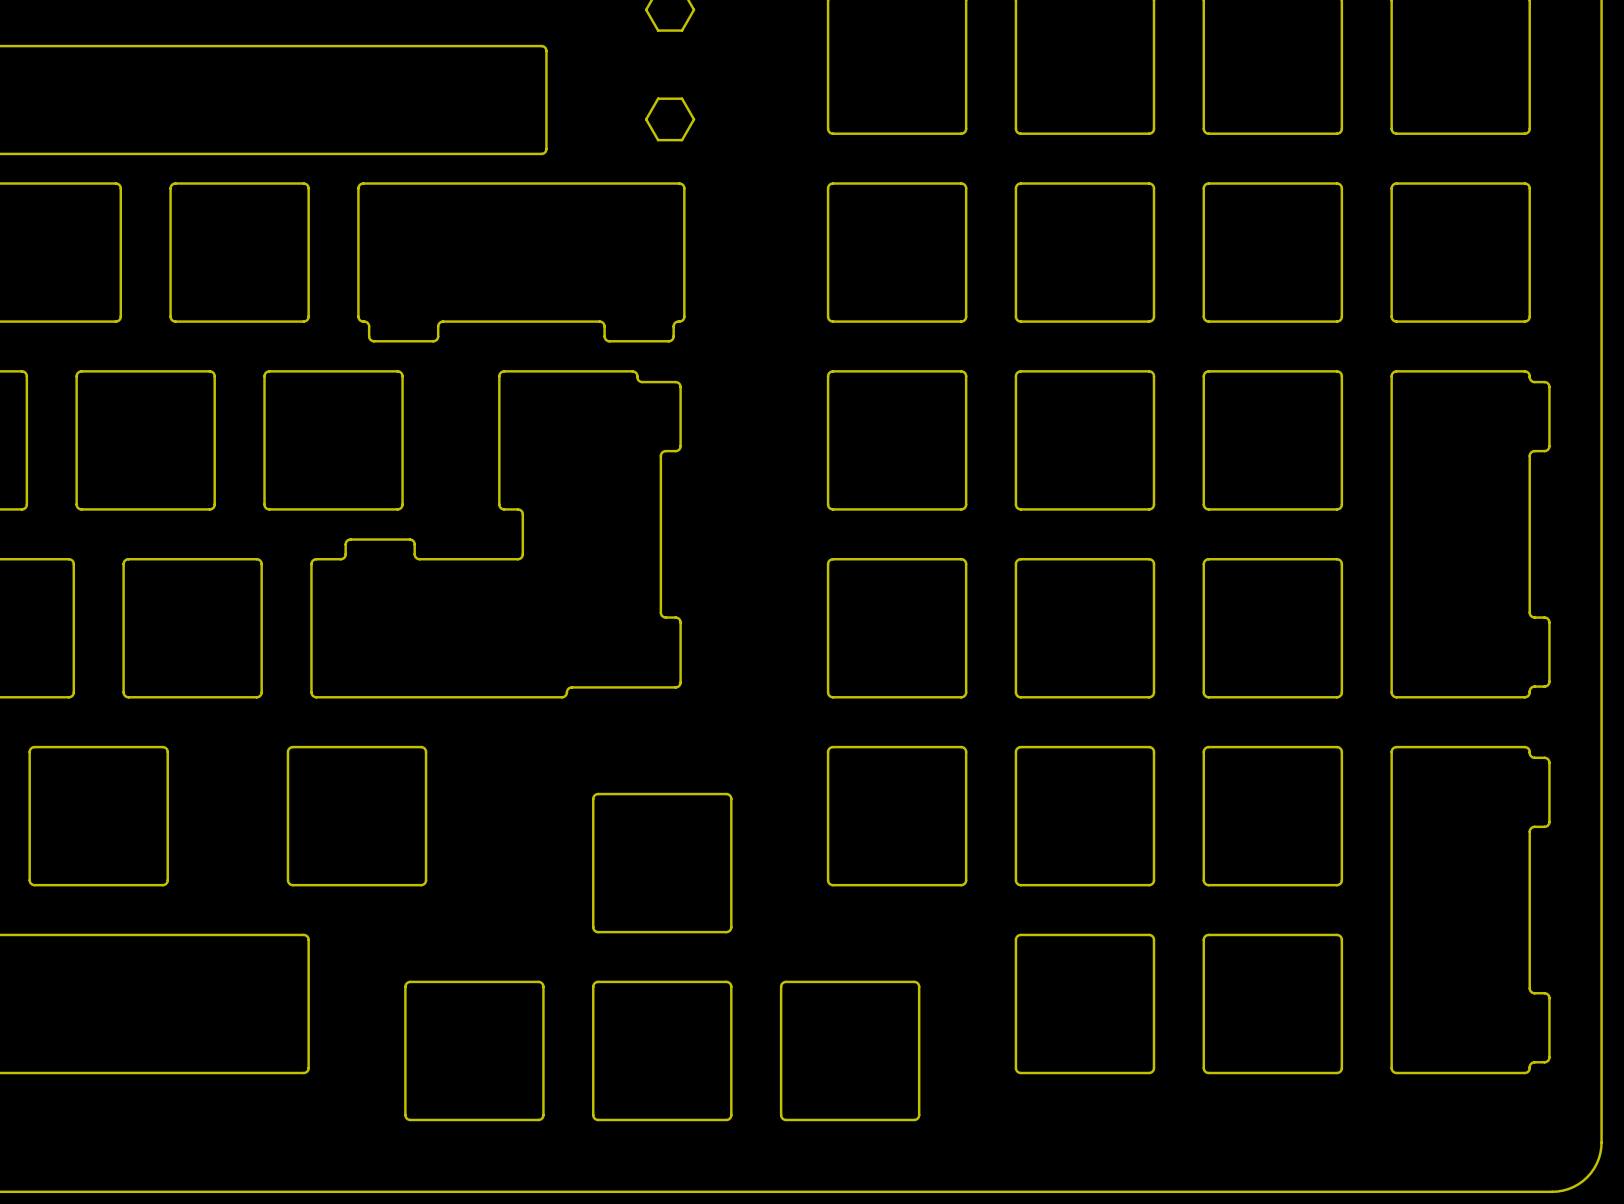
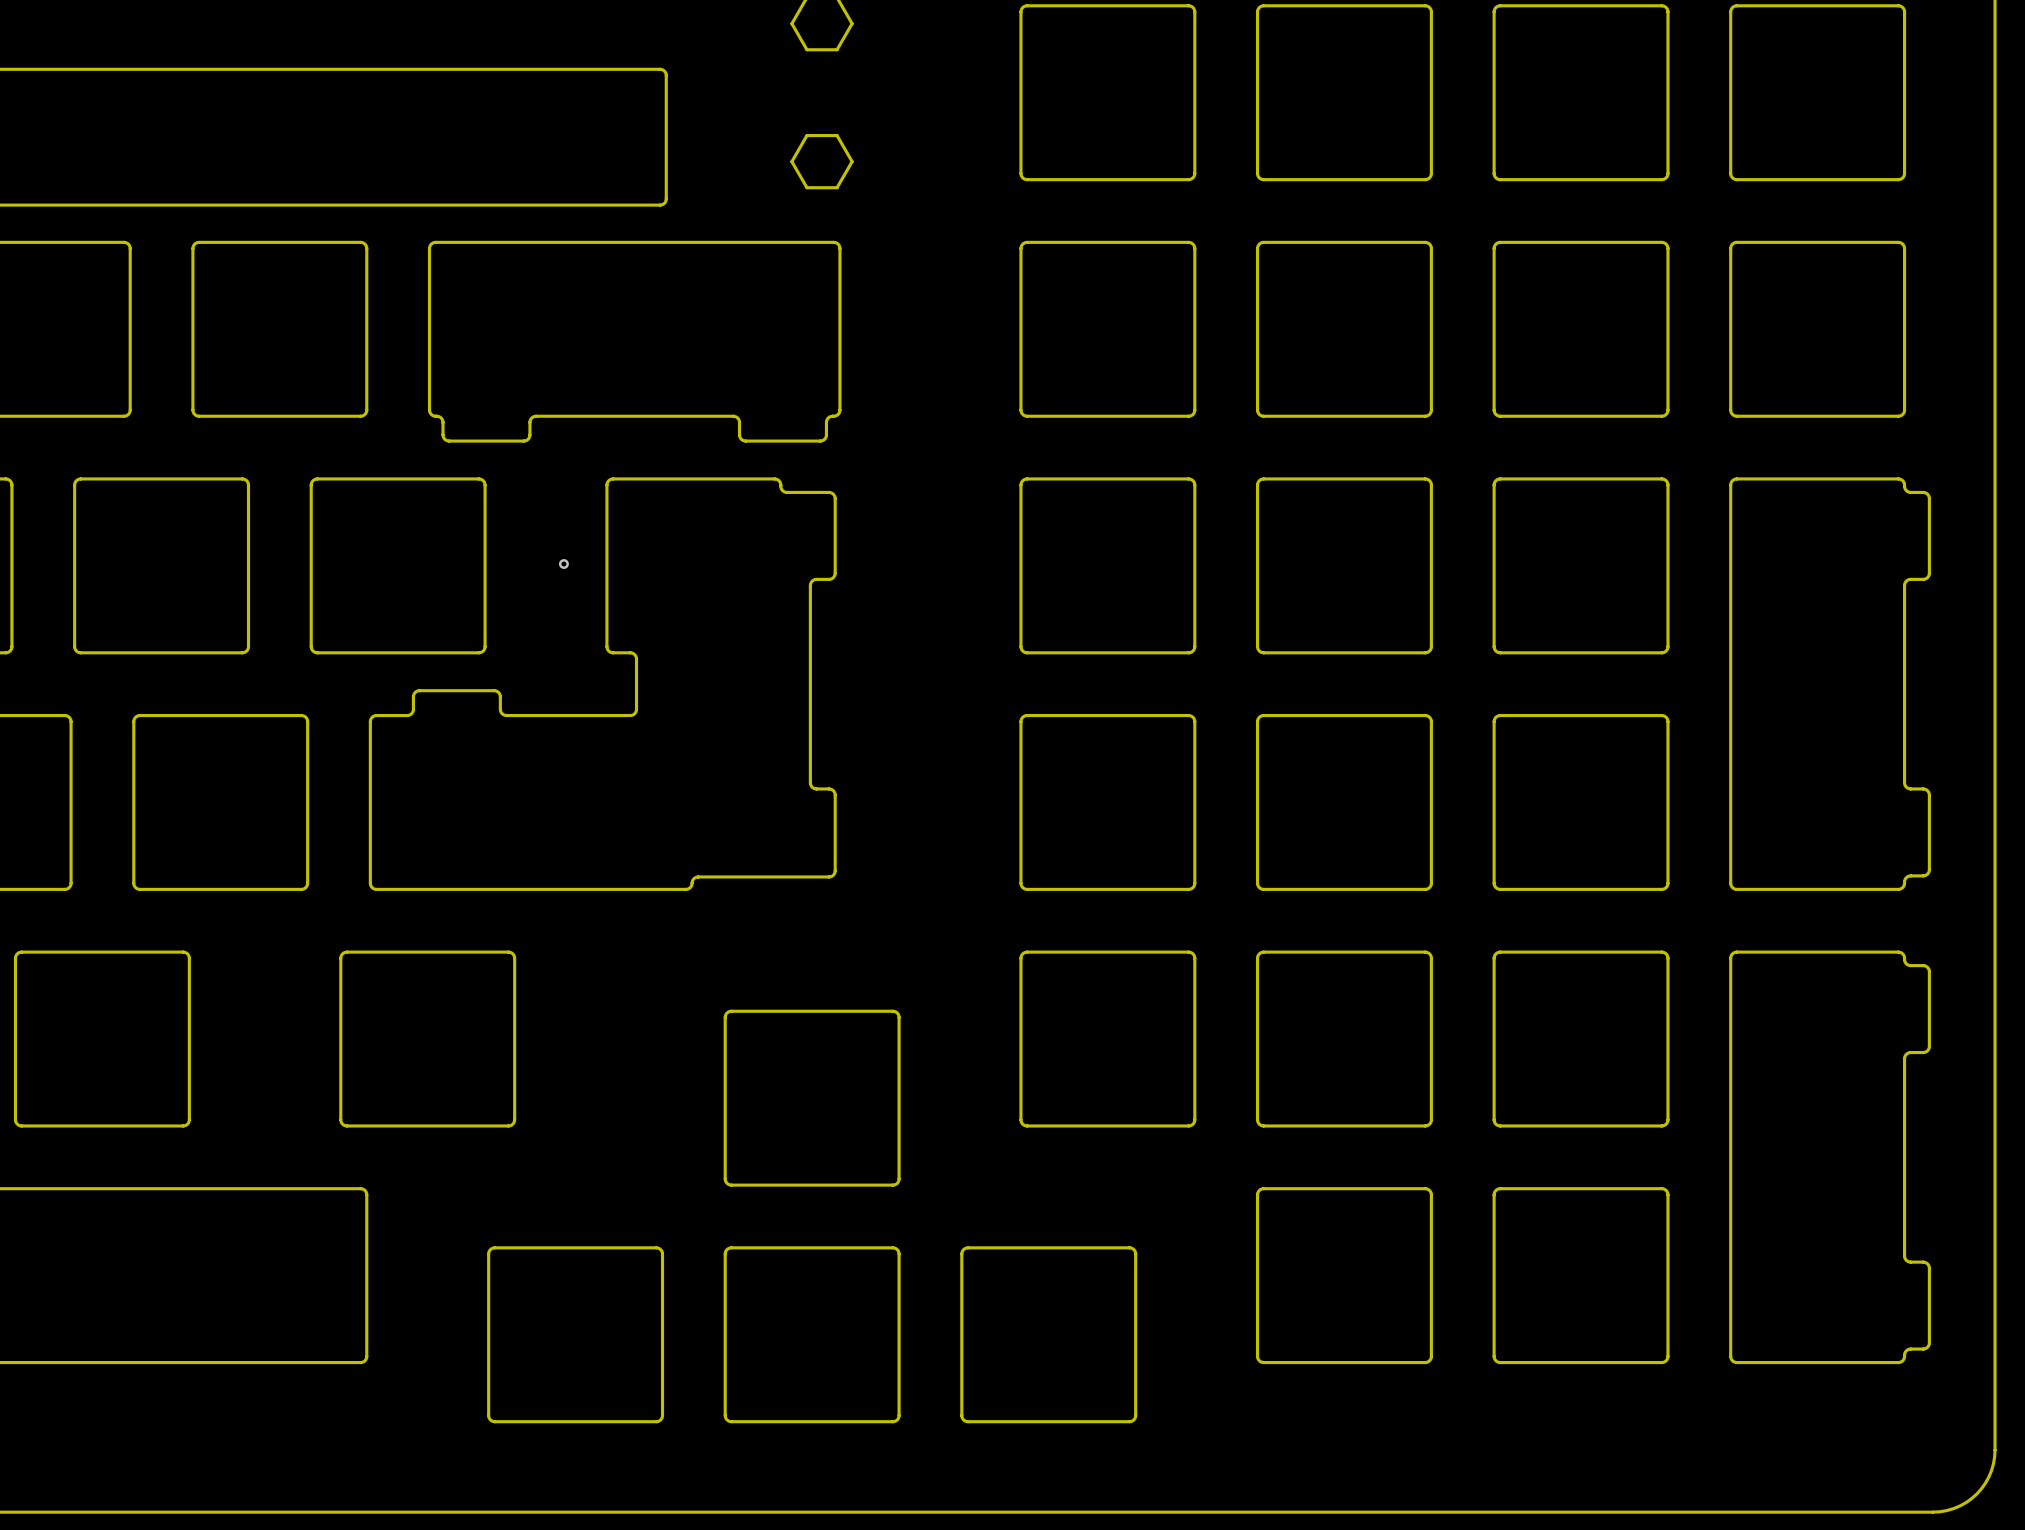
via: none -> (563, 564)

